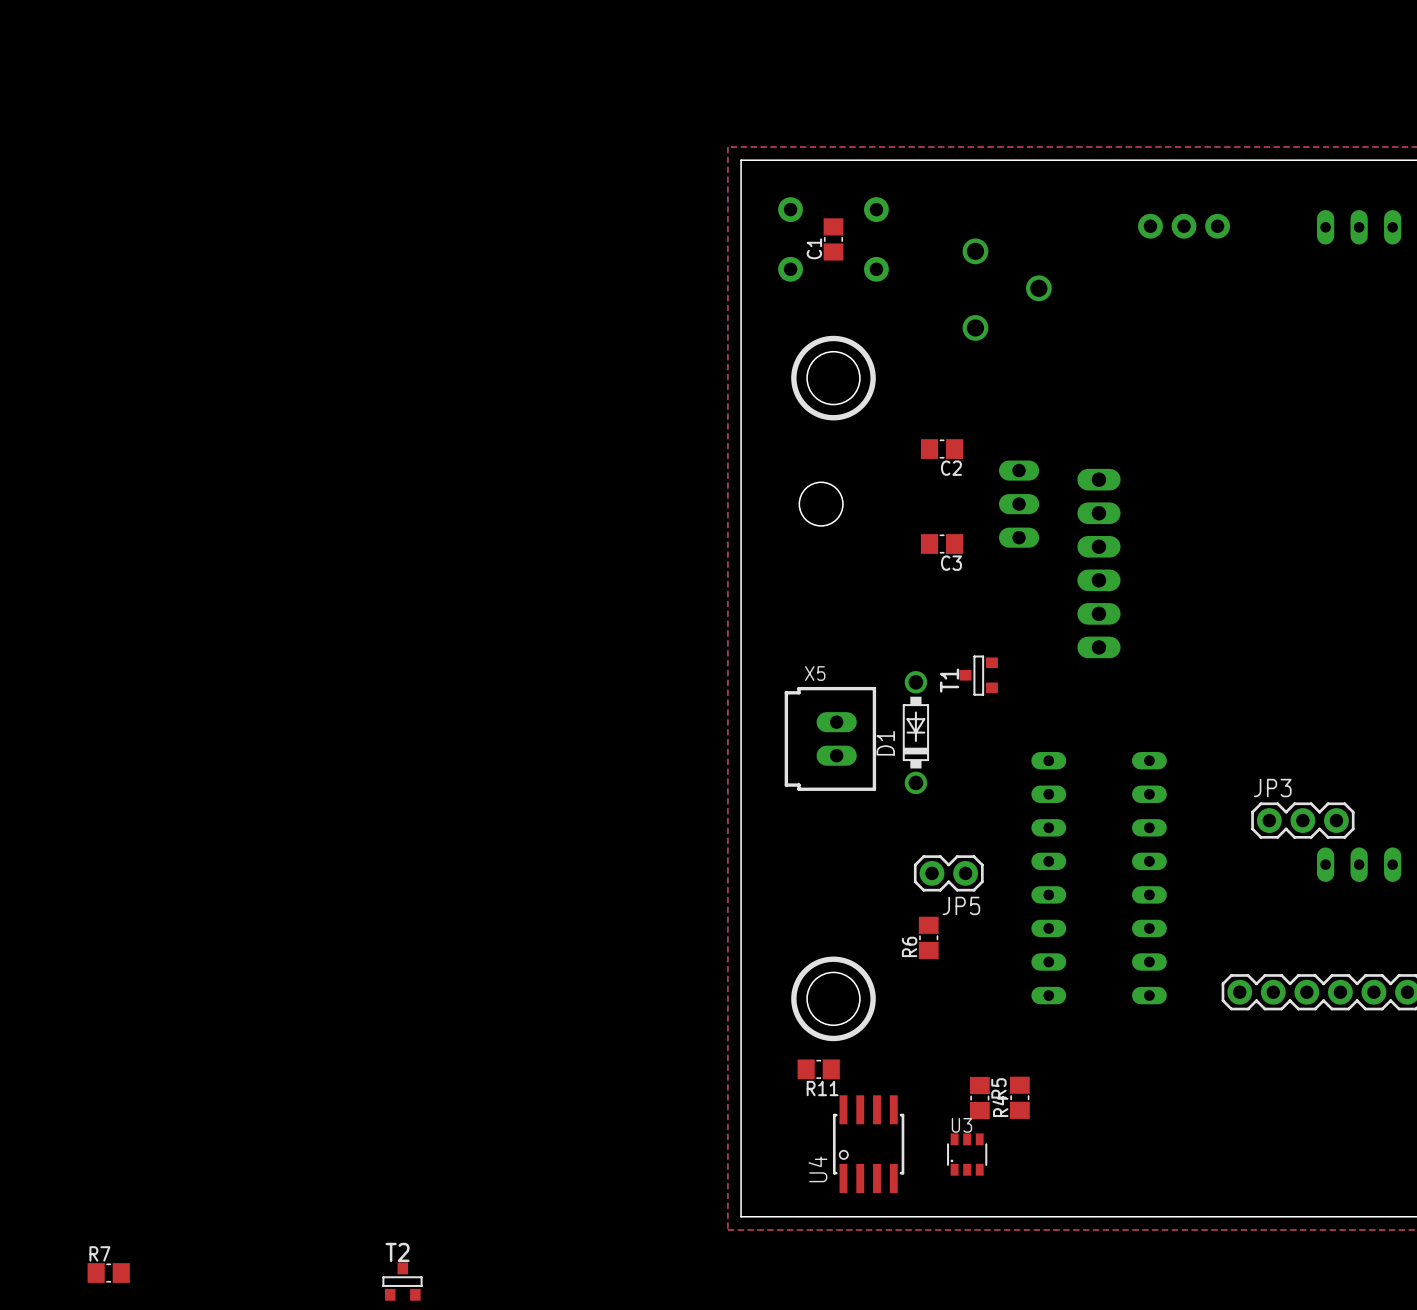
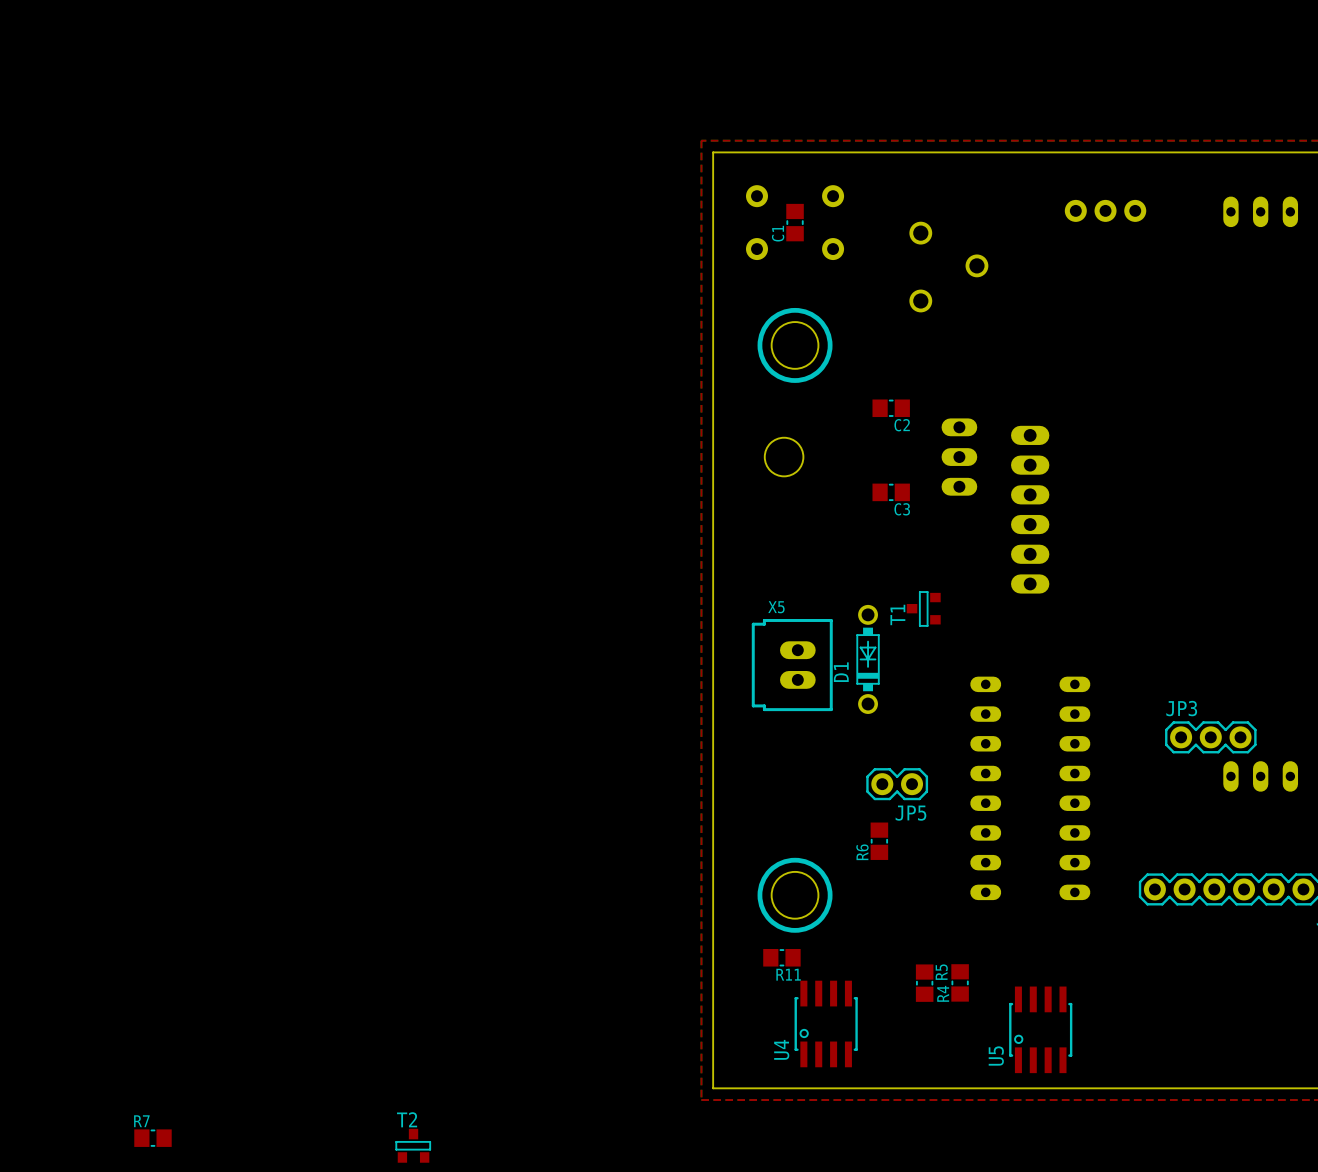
U5: none -> (1040, 1029)
U3: (967, 1154) -> none

